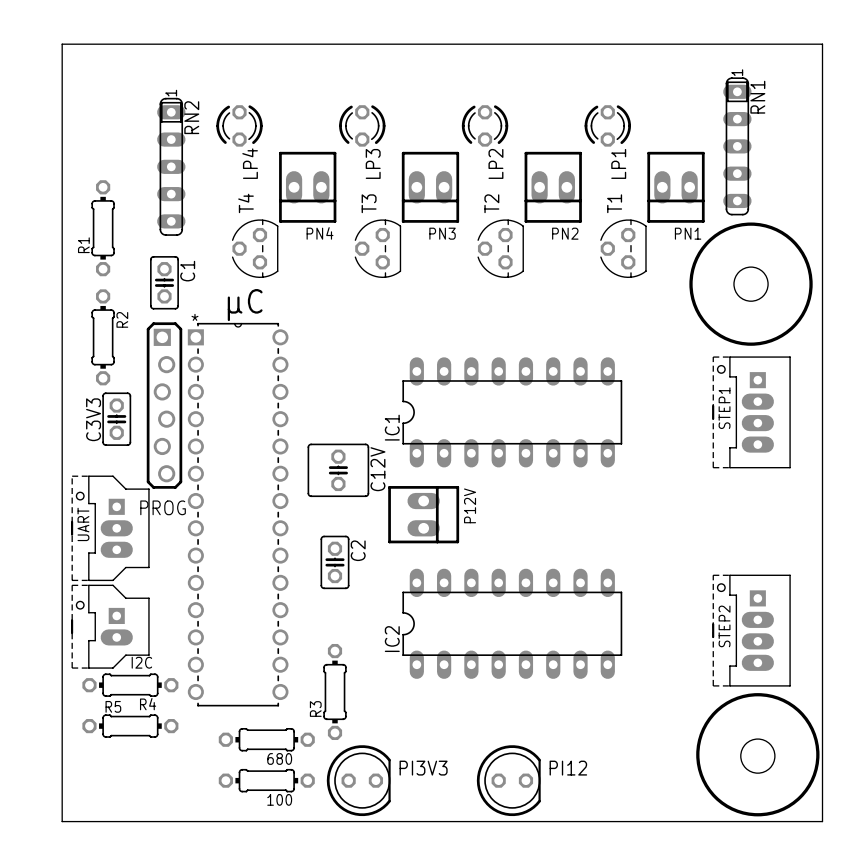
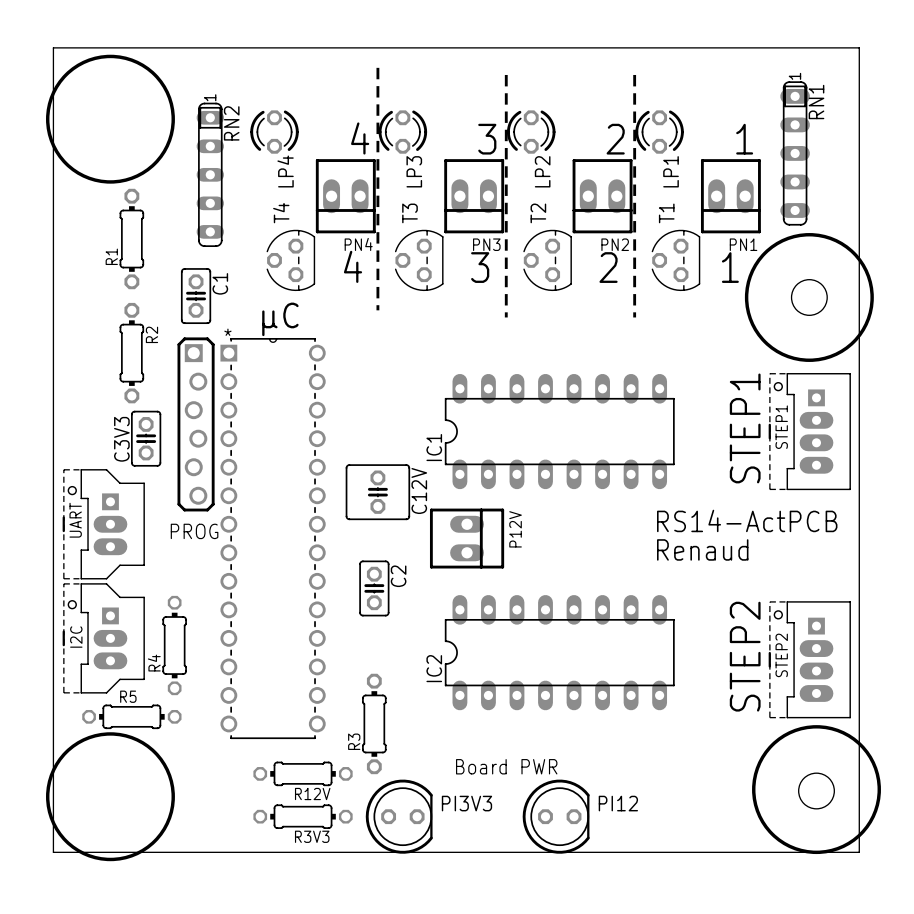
board edge: (62, 44) (822, 44) (822, 821) (62, 821) (62, 44) -> (53, 47) (53, 852) (859, 852) (859, 47) (53, 47)
drawing: none -> [46, 54, 175, 184]
line: none -> (377, 67) (377, 310)
line: none -> (506, 74) (506, 317)
line: none -> (634, 74) (634, 317)
RN2 footprint: [157, 97, 186, 236] -> [196, 102, 225, 248]
text: none -> 4 (360, 138)
text: none -> 3 (487, 139)
text: none -> 2 (615, 139)
text: none -> 1 (744, 139)
text: none -> 4 (353, 266)
text: none -> 3 (480, 267)
text: none -> 2 (608, 267)
text: none -> 1 (730, 267)
text: none -> STEP1 (745, 428)
text: none -> RS14-ActPCB (747, 520)
text: none -> Renaud (702, 549)
UART position: (110, 528) -> (103, 524)
I2C footprint: [70, 584, 150, 669] -> [62, 583, 145, 694]
text: none -> STEP2 (745, 656)
I2C name position: I2C (141, 662) -> I2C (76, 637)
R4 footprint: [82, 673, 179, 697] -> [162, 595, 187, 696]
drawing: none -> [46, 732, 175, 862]
R4 name position: R4 (148, 704) -> R4 (154, 663)
R5 footprint: [82, 714, 179, 738] -> [82, 704, 182, 730]
text: none -> Board PWR (506, 766)
680: (266, 739) -> none
R12V: none -> (303, 773)
100: (266, 780) -> none
R3V3: none -> (303, 816)

